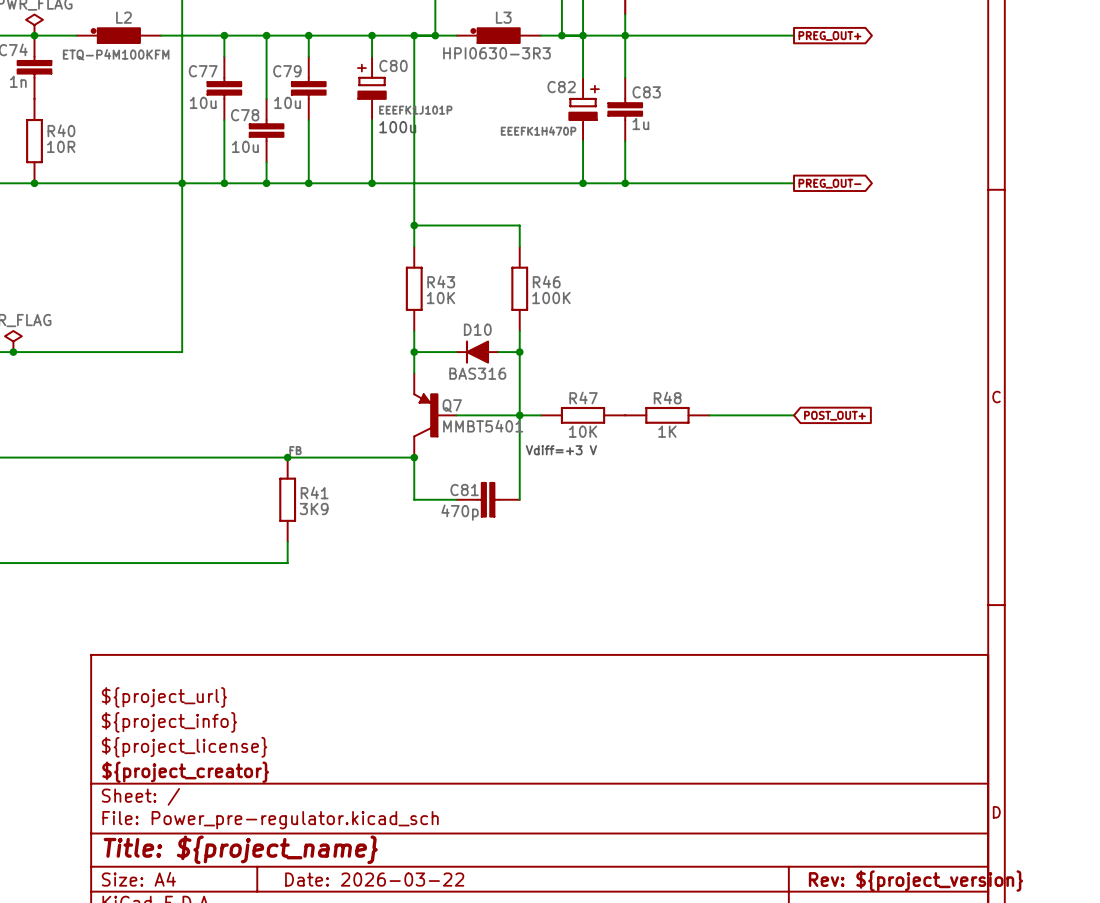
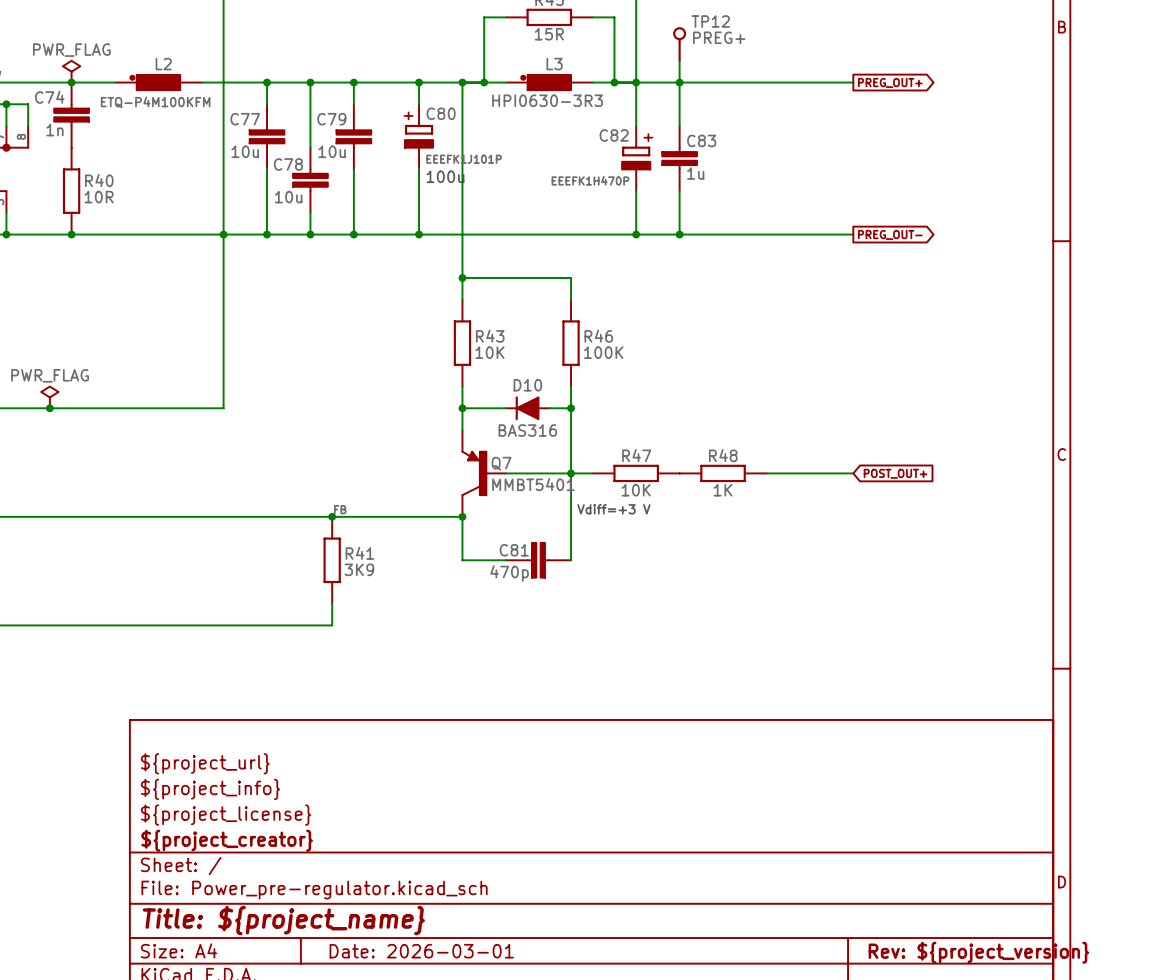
title block: Date: 2026-03-22 (374, 879) -> Date: 2026-03-01 (421, 951)

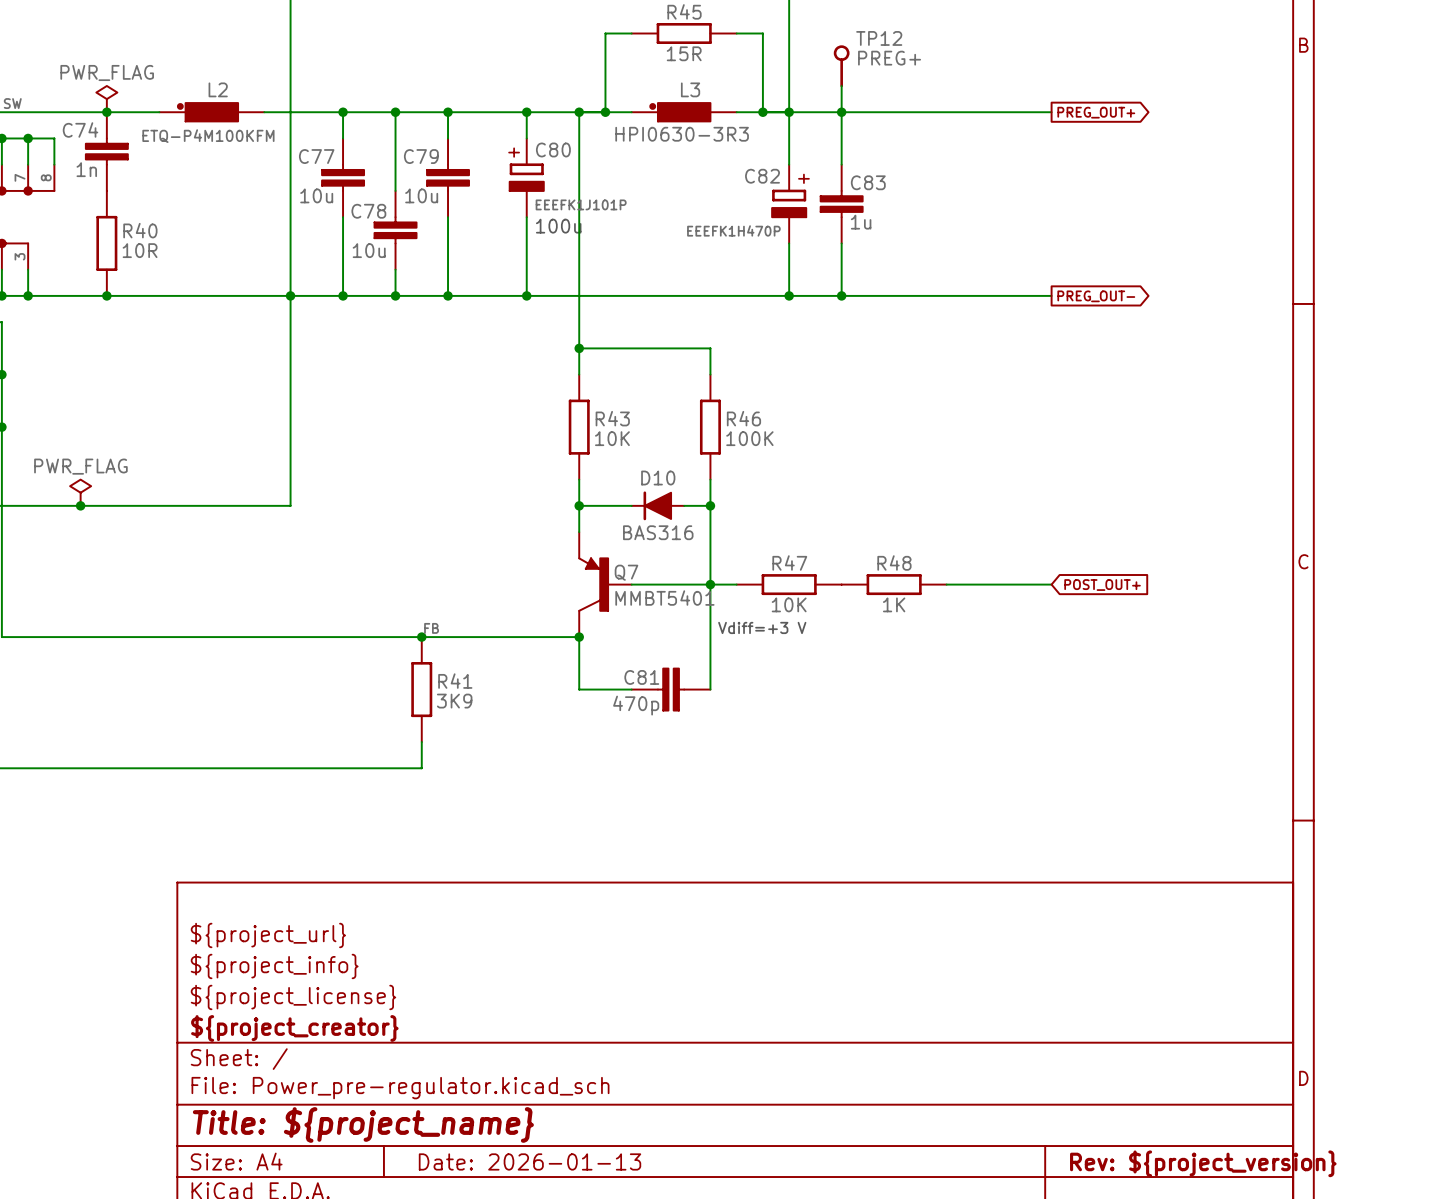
title block: Date: 2026-03-01 (421, 951) -> Date: 2026-01-13 (530, 1161)

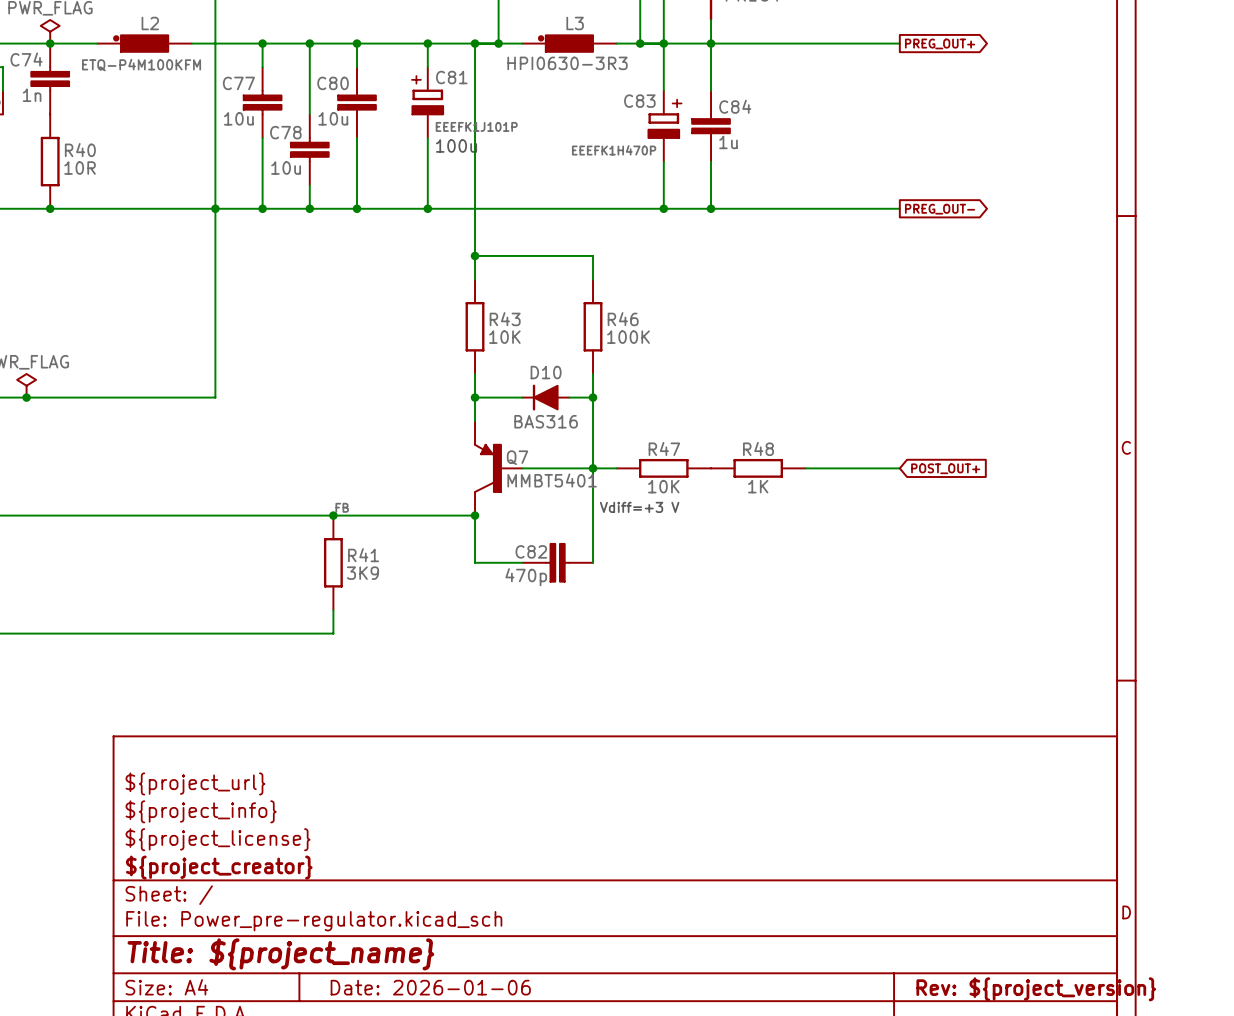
C80 name: C80 (553, 149) -> C81 (451, 77)
C79 name: C79 (421, 156) -> C80 (333, 83)
C82 name: C82 (762, 176) -> C83 (639, 101)
C83 name: C83 (868, 182) -> C84 (735, 106)
C81 name: C81 (641, 677) -> C82 (531, 551)
title block: Date: 2026-01-13 (530, 1161) -> Date: 2026-01-06 (430, 987)

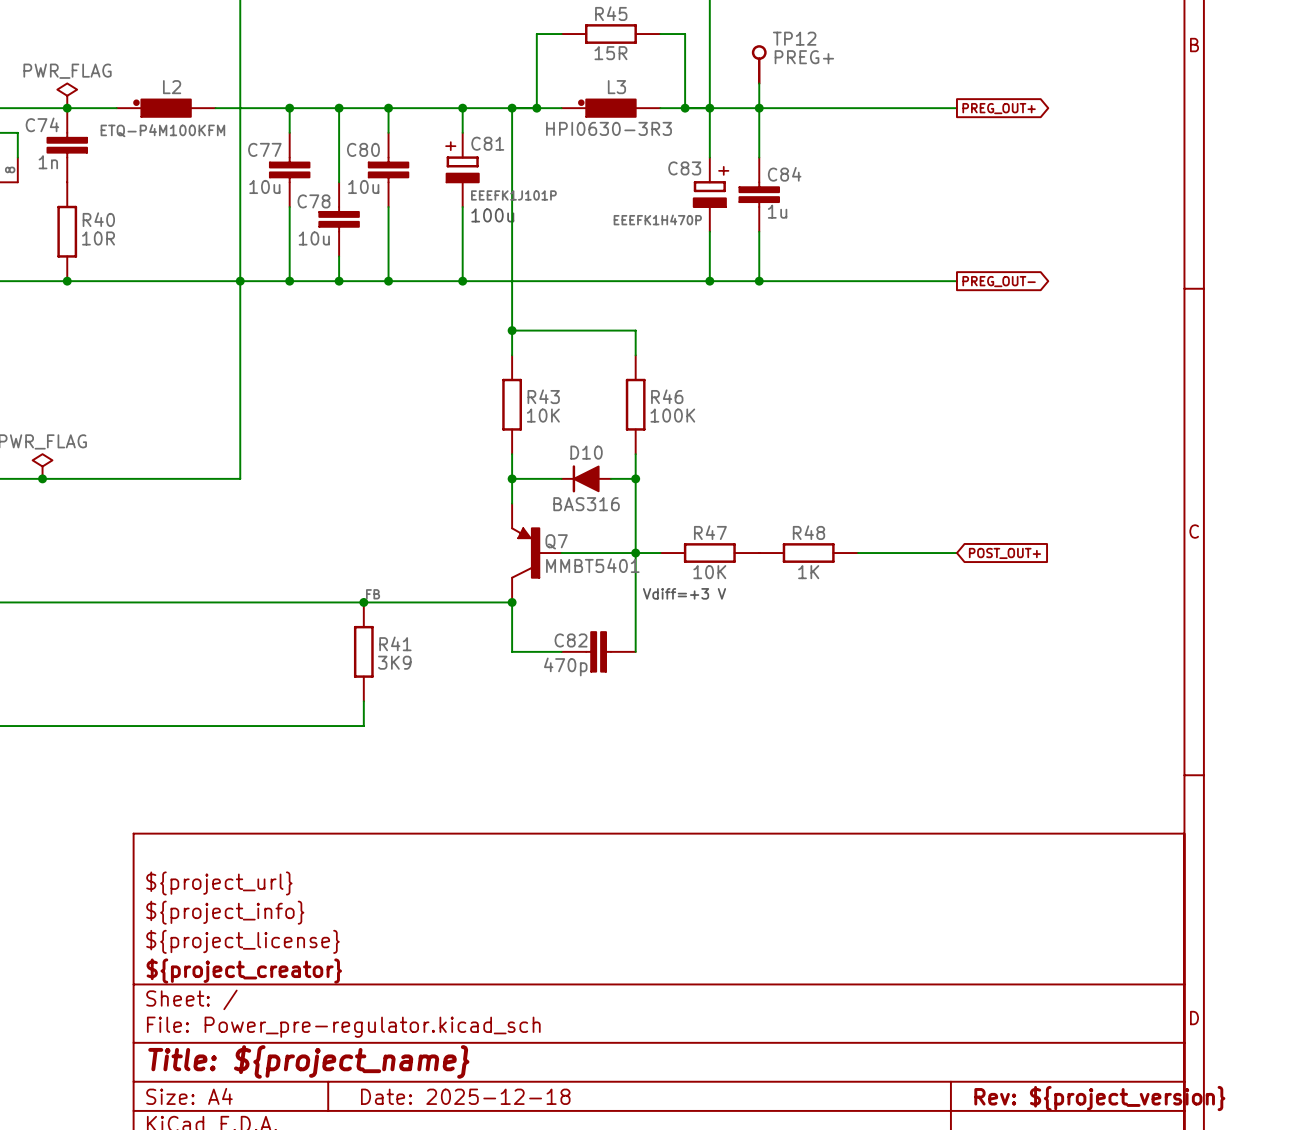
title block: Date: 2026-01-06 (430, 987) -> Date: 2025-12-18 (465, 1096)

